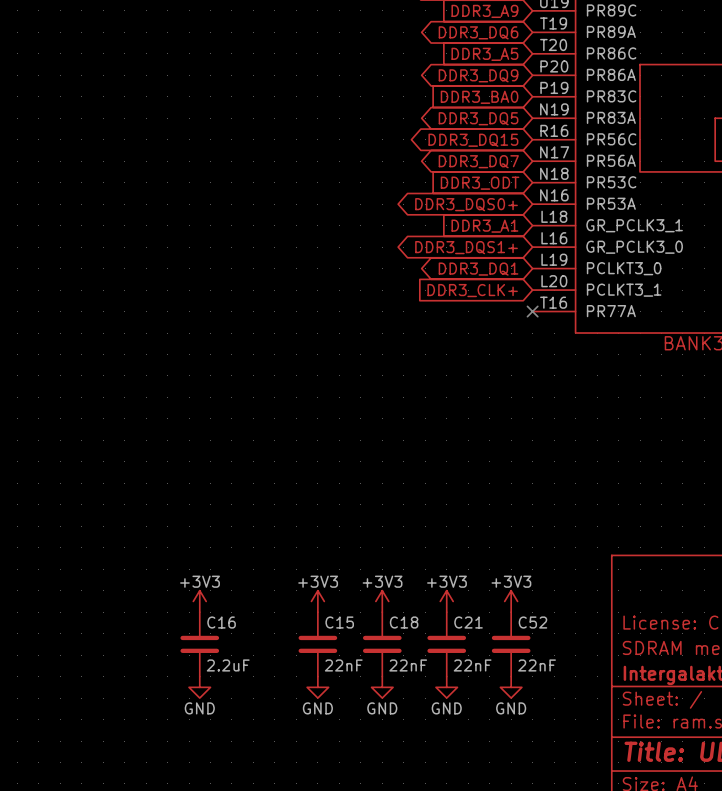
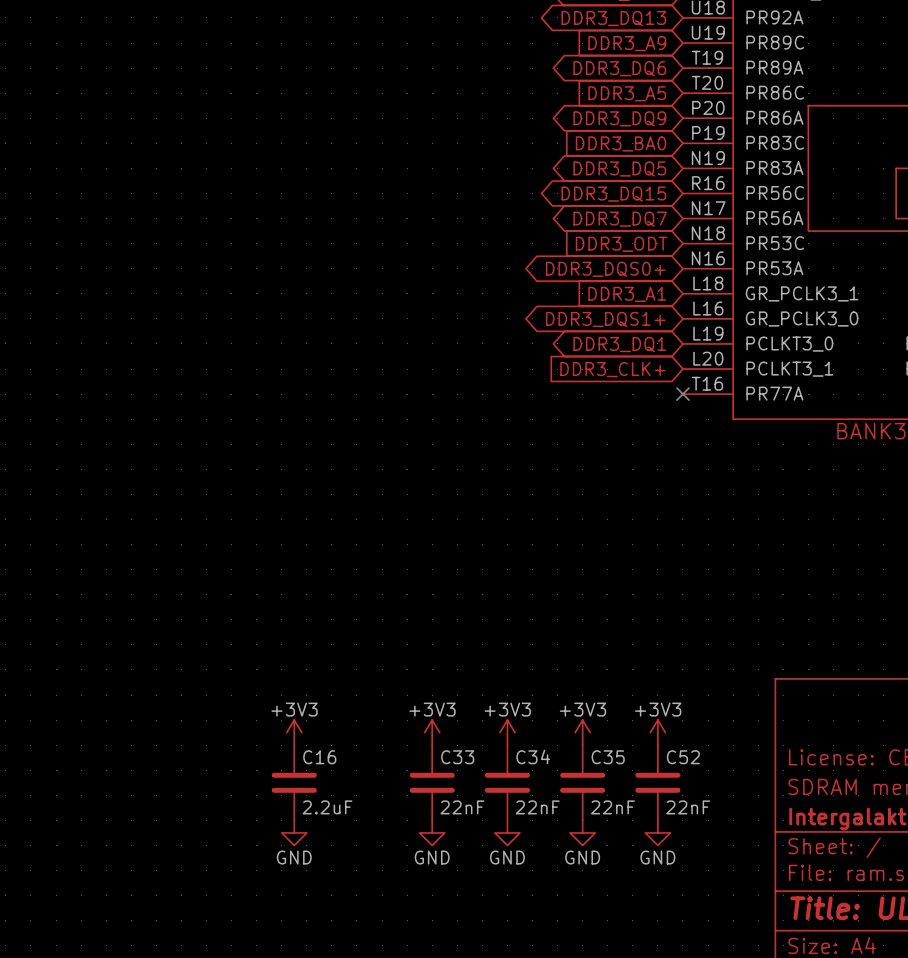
C15 name: C15 (339, 622) -> C33 (457, 757)
C18 name: C18 (404, 622) -> C34 (533, 756)
C21 name: C21 (468, 622) -> C35 (608, 757)

